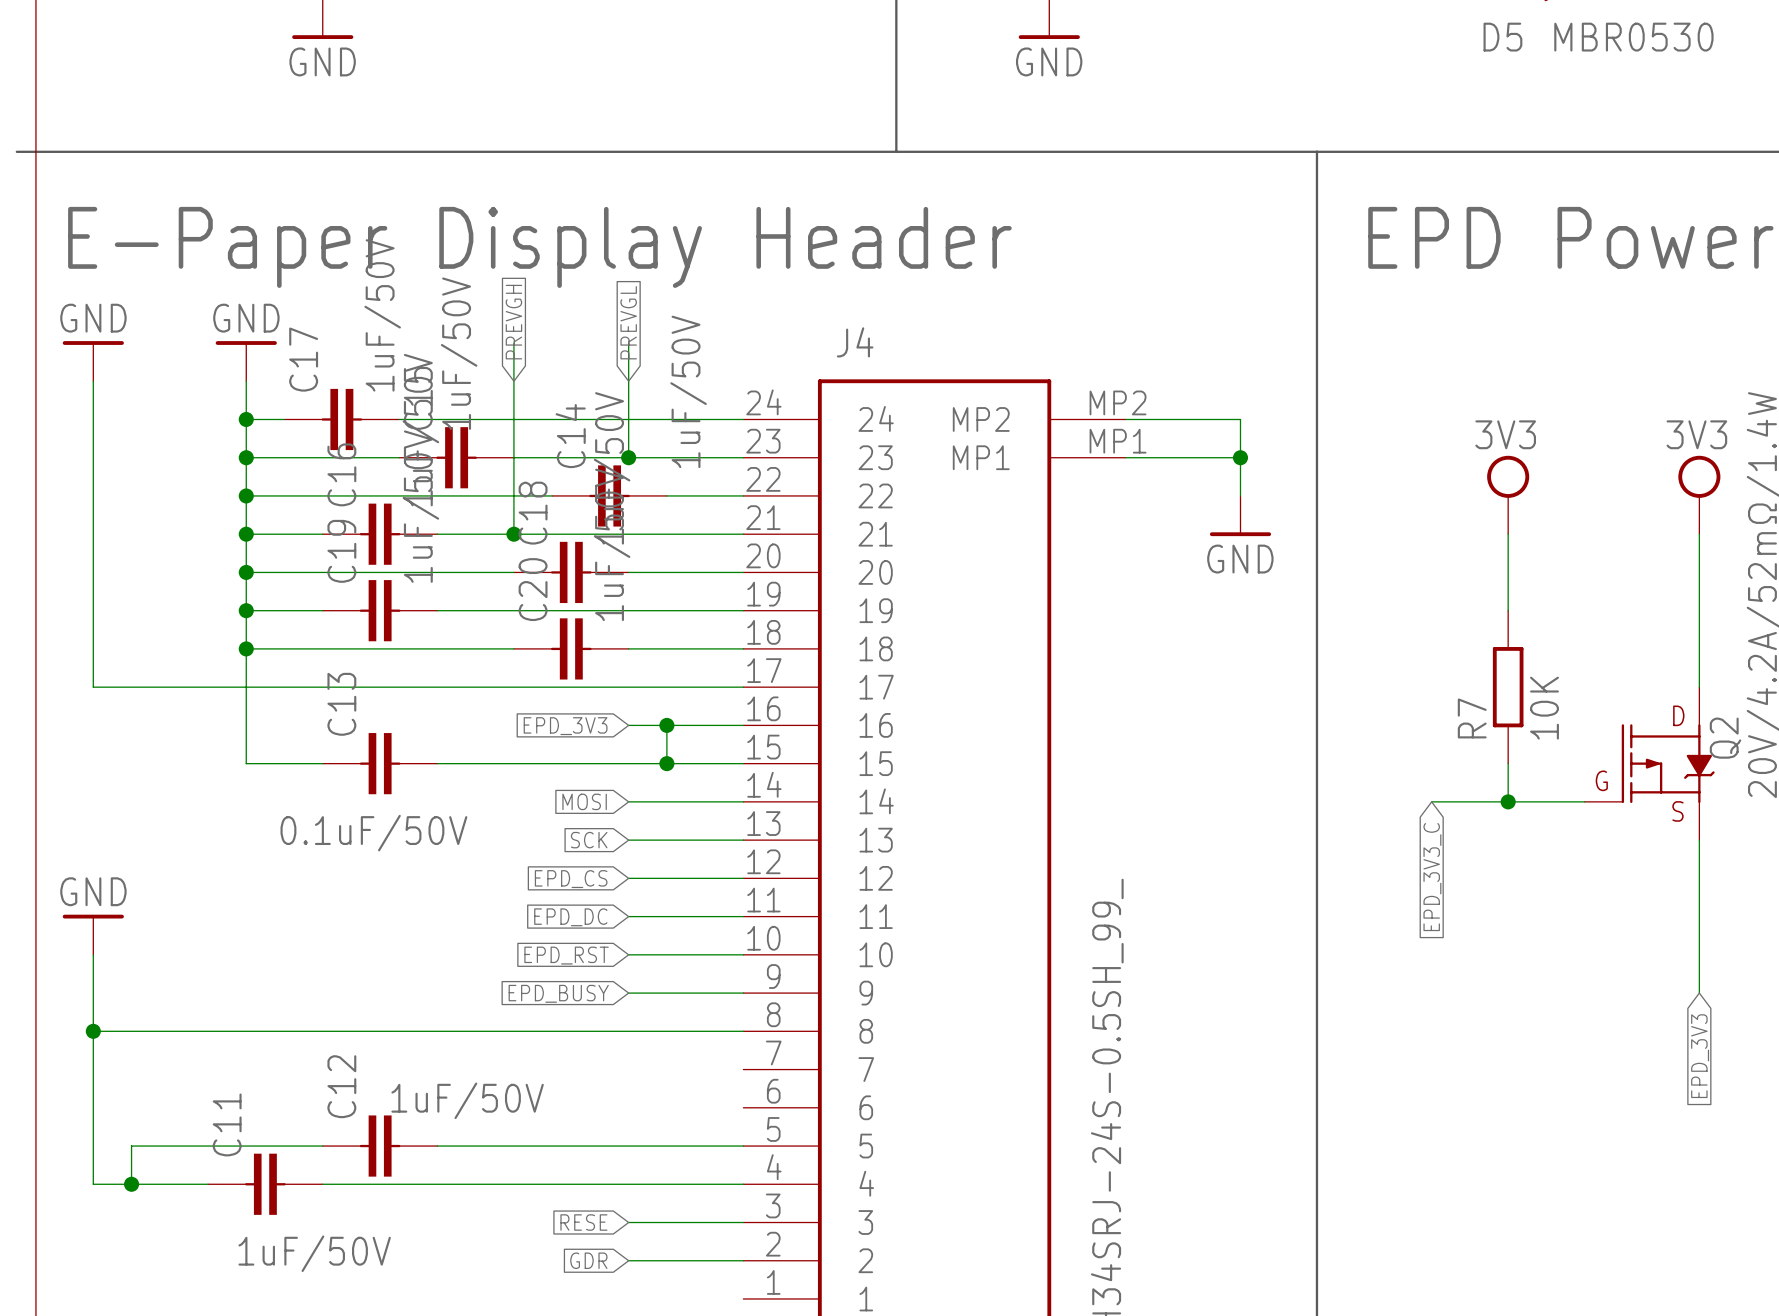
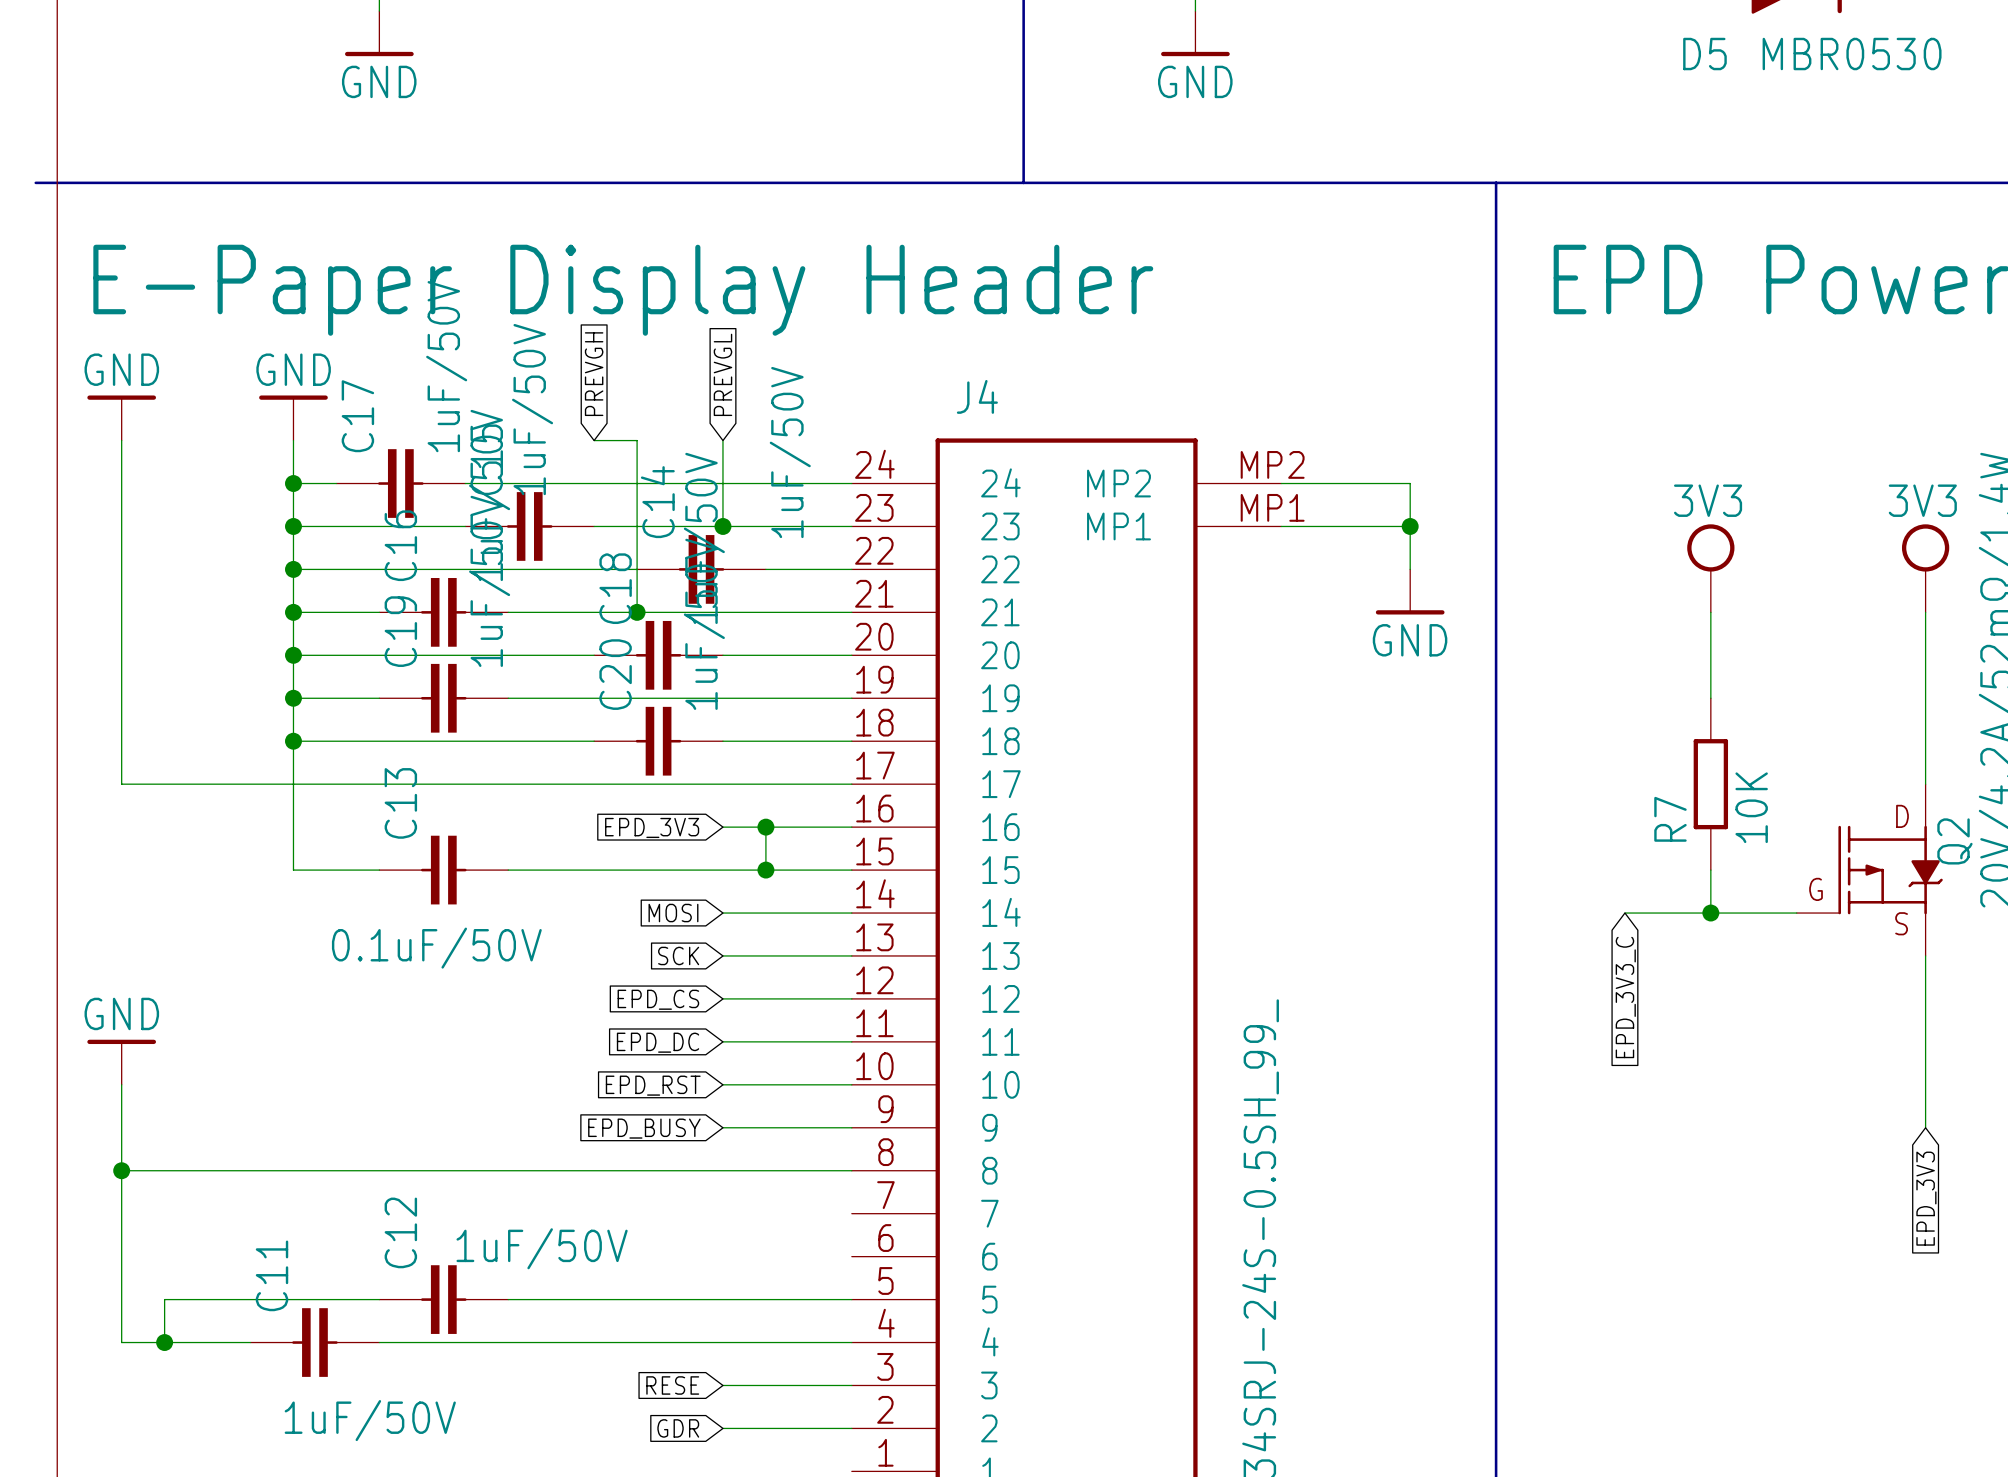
wire: (513, 343) (513, 534) -> none
wire: (628, 343) (628, 381) -> none
wire: none -> (594, 440) (637, 440) (637, 612)
junction position: (513, 534) -> (637, 612)

